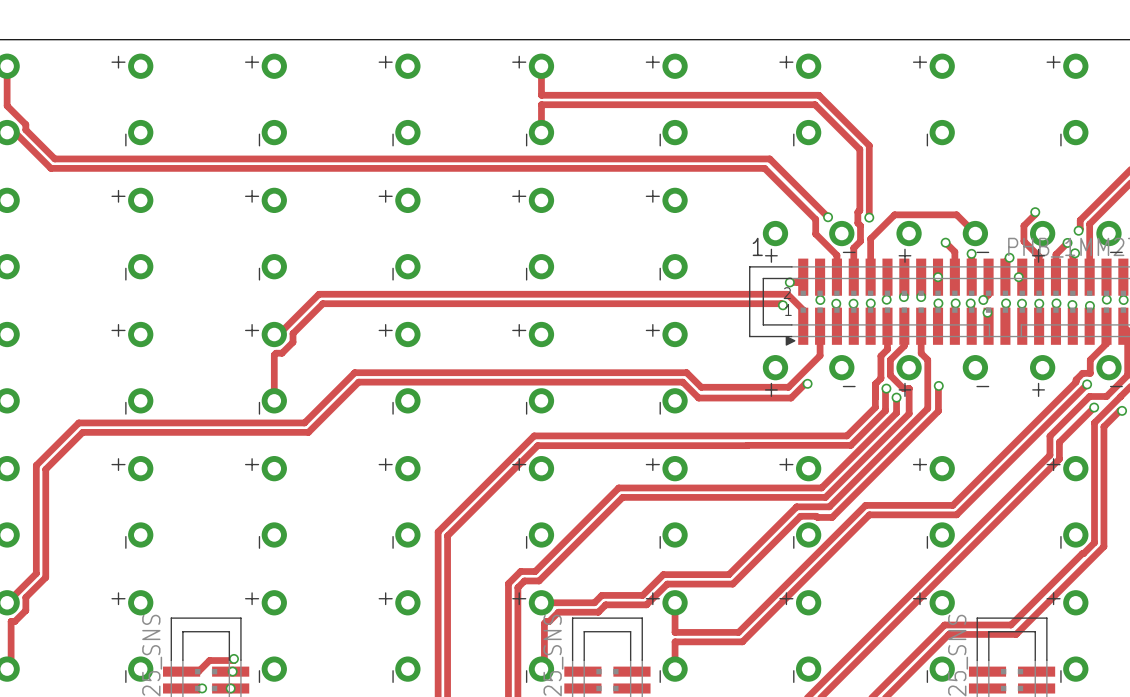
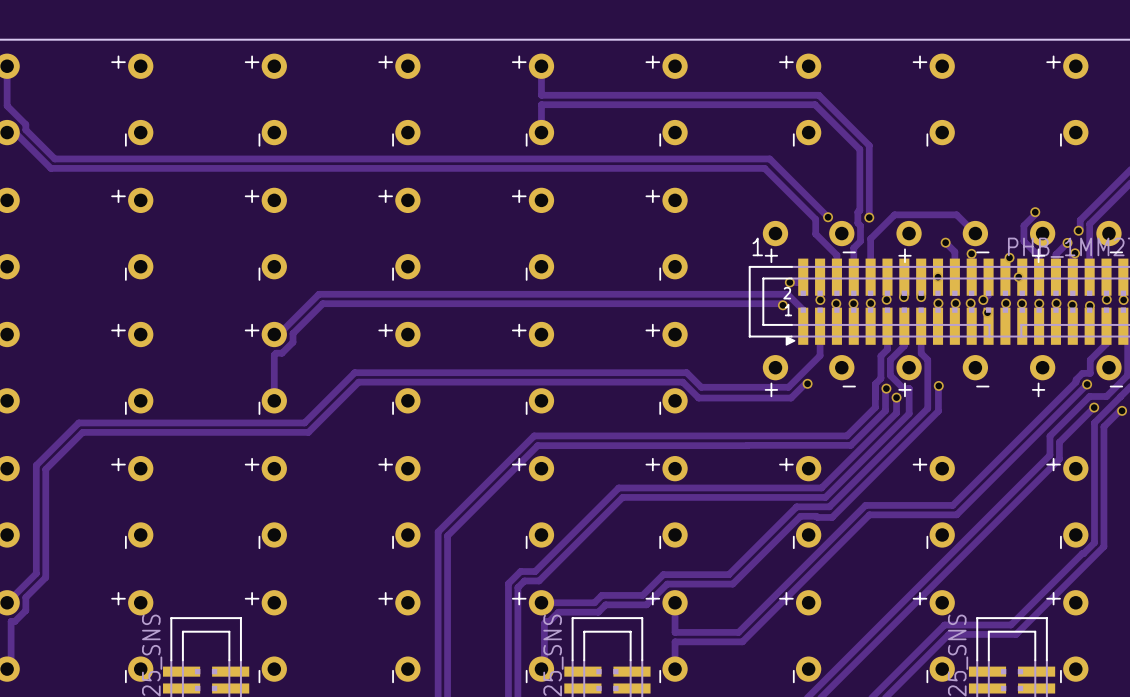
track: (233, 658) (233, 660) (209, 660) (198, 671) (181, 671) -> none
via: (233, 658) -> none
via: (232, 671) -> none
via: (202, 688) -> none
via: (230, 688) -> none

